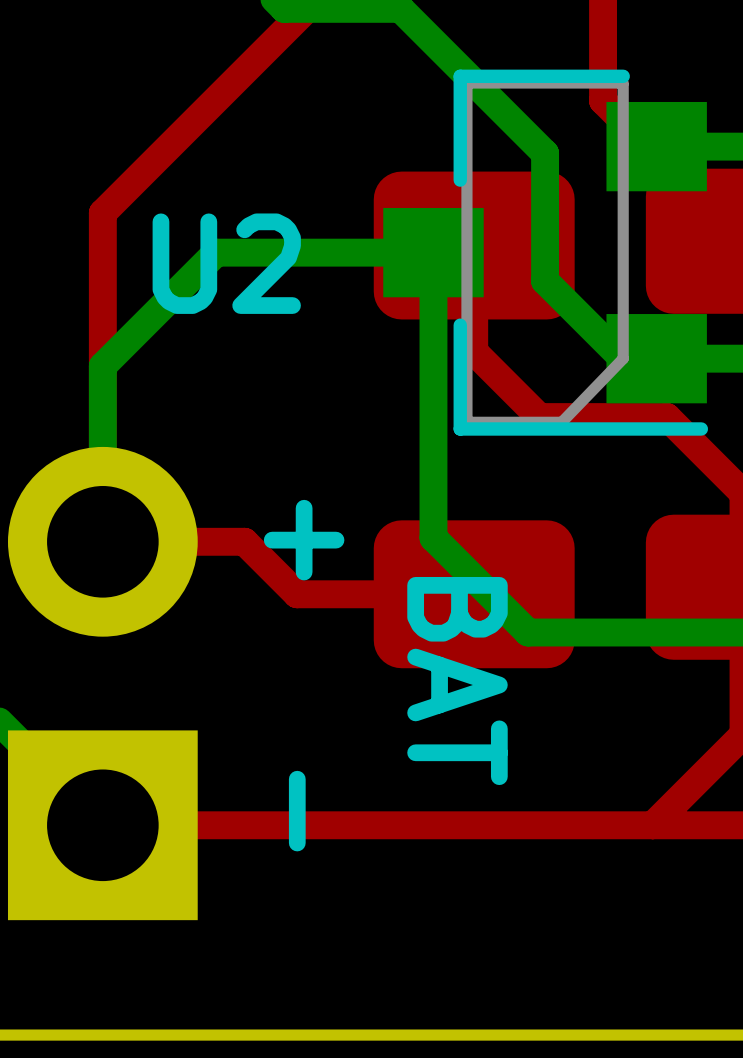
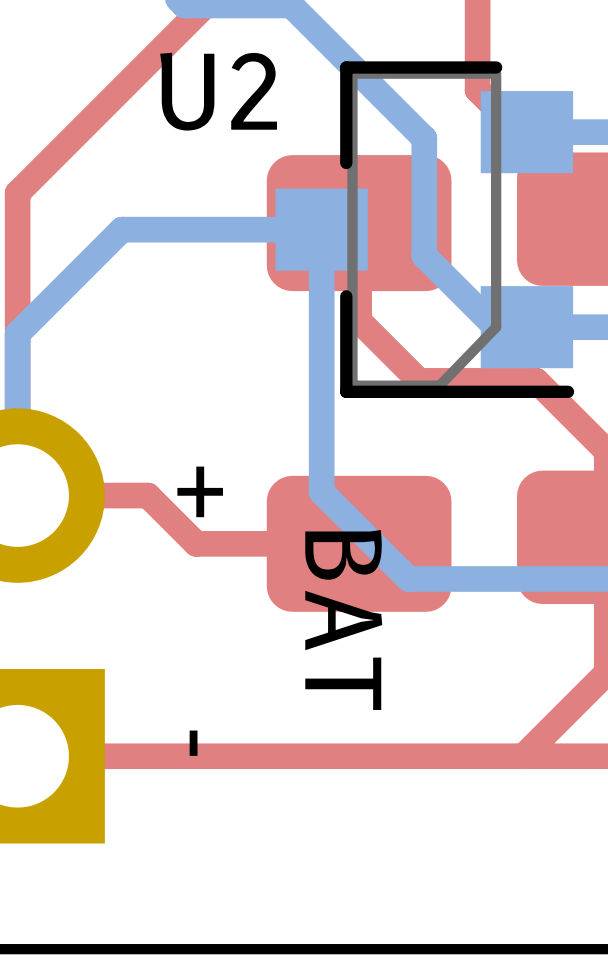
U2 name position: U2 (226, 263) -> U2 (218, 91)

